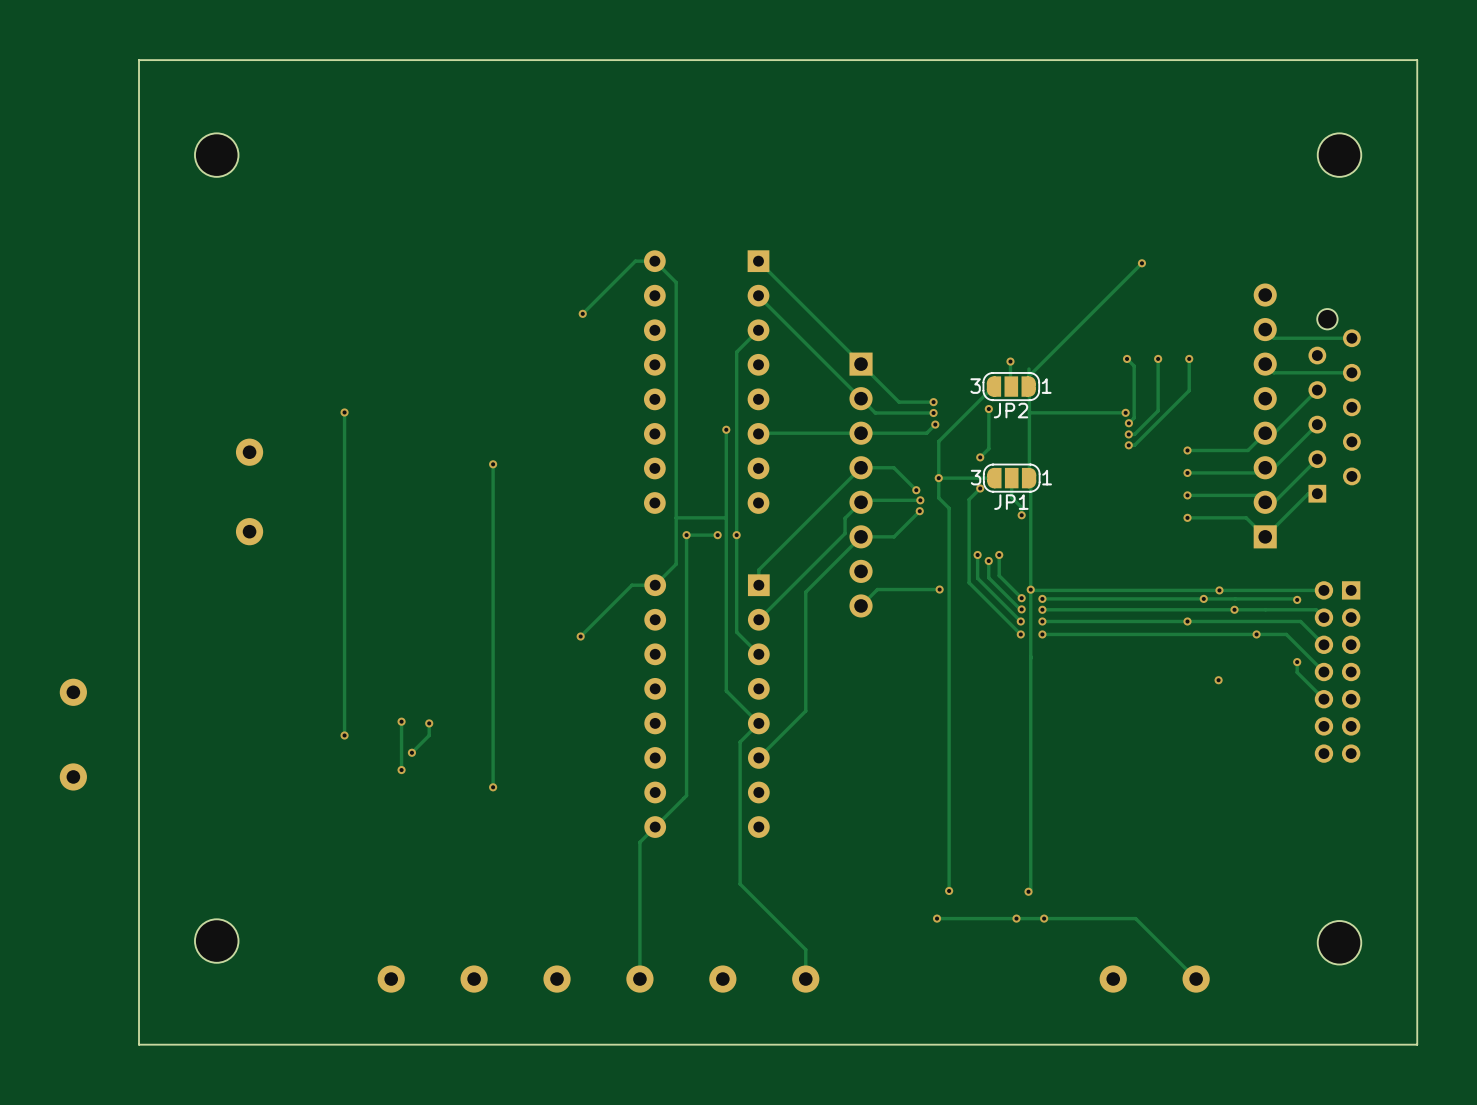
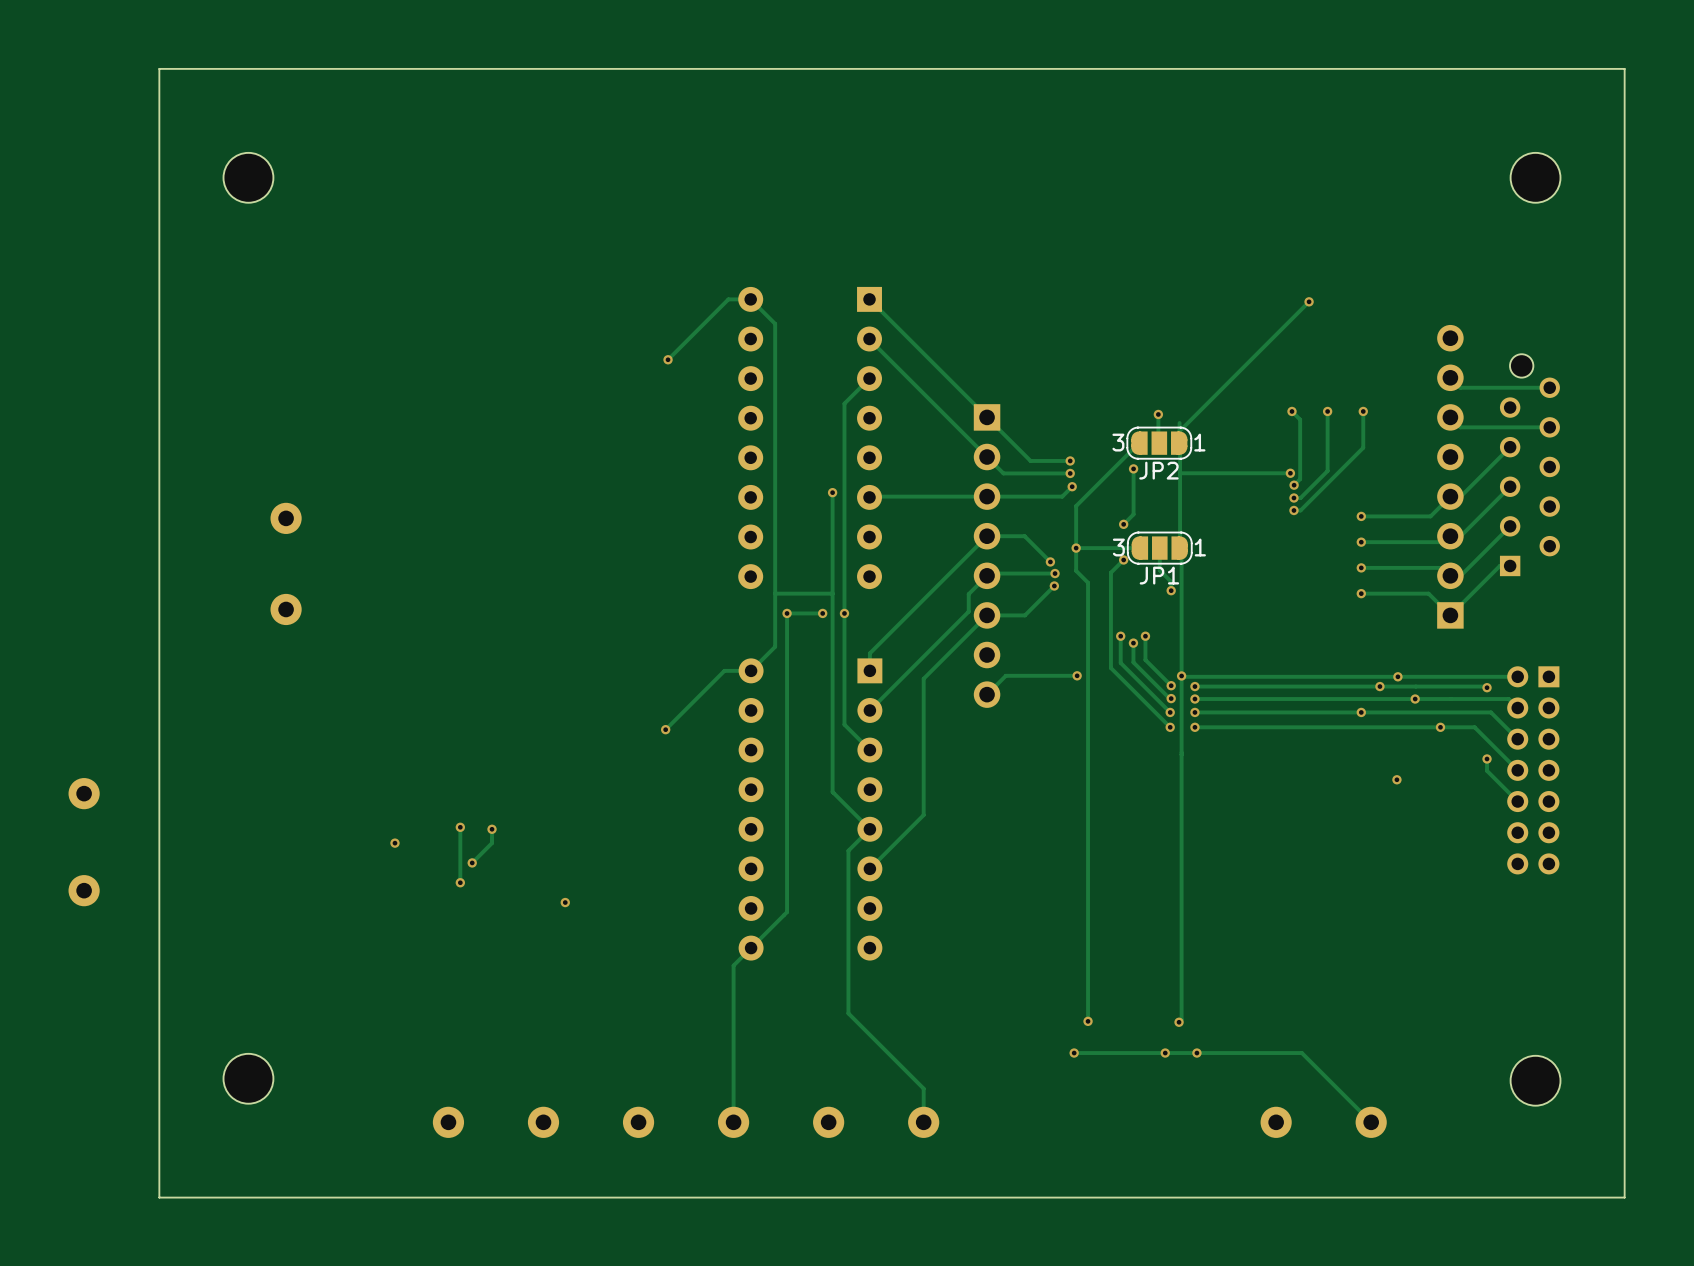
track: (344, 412) (344, 735) -> none
via: (344, 412) -> none
track: (493, 464) (493, 787) -> none
via: (493, 464) -> none

